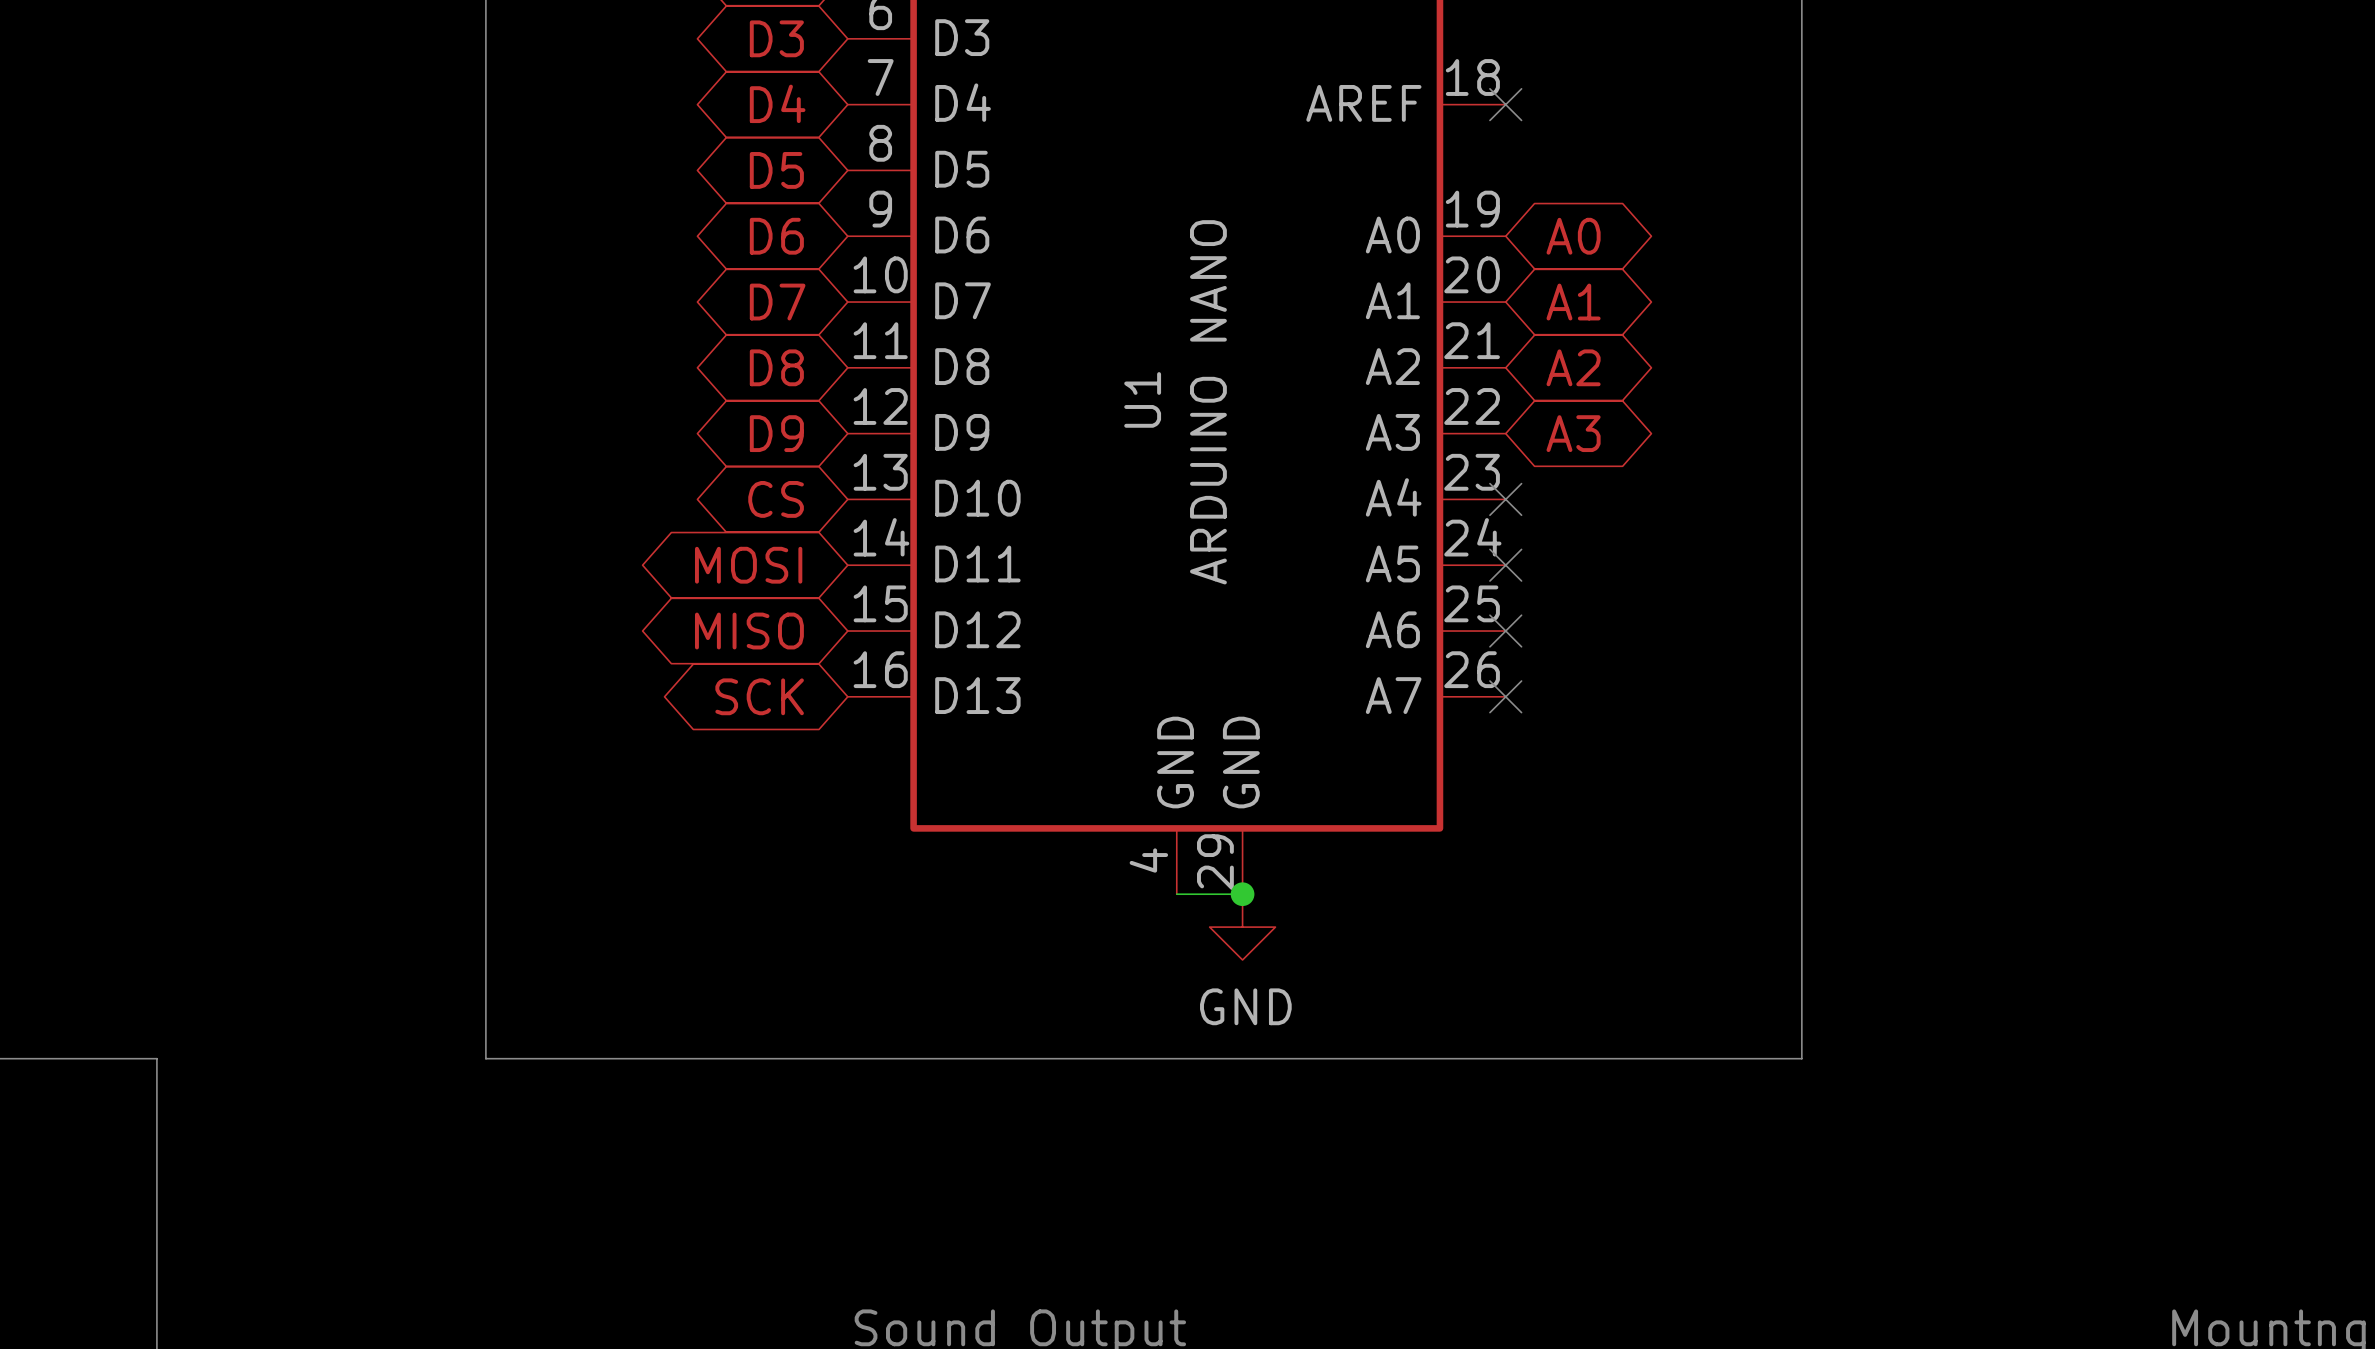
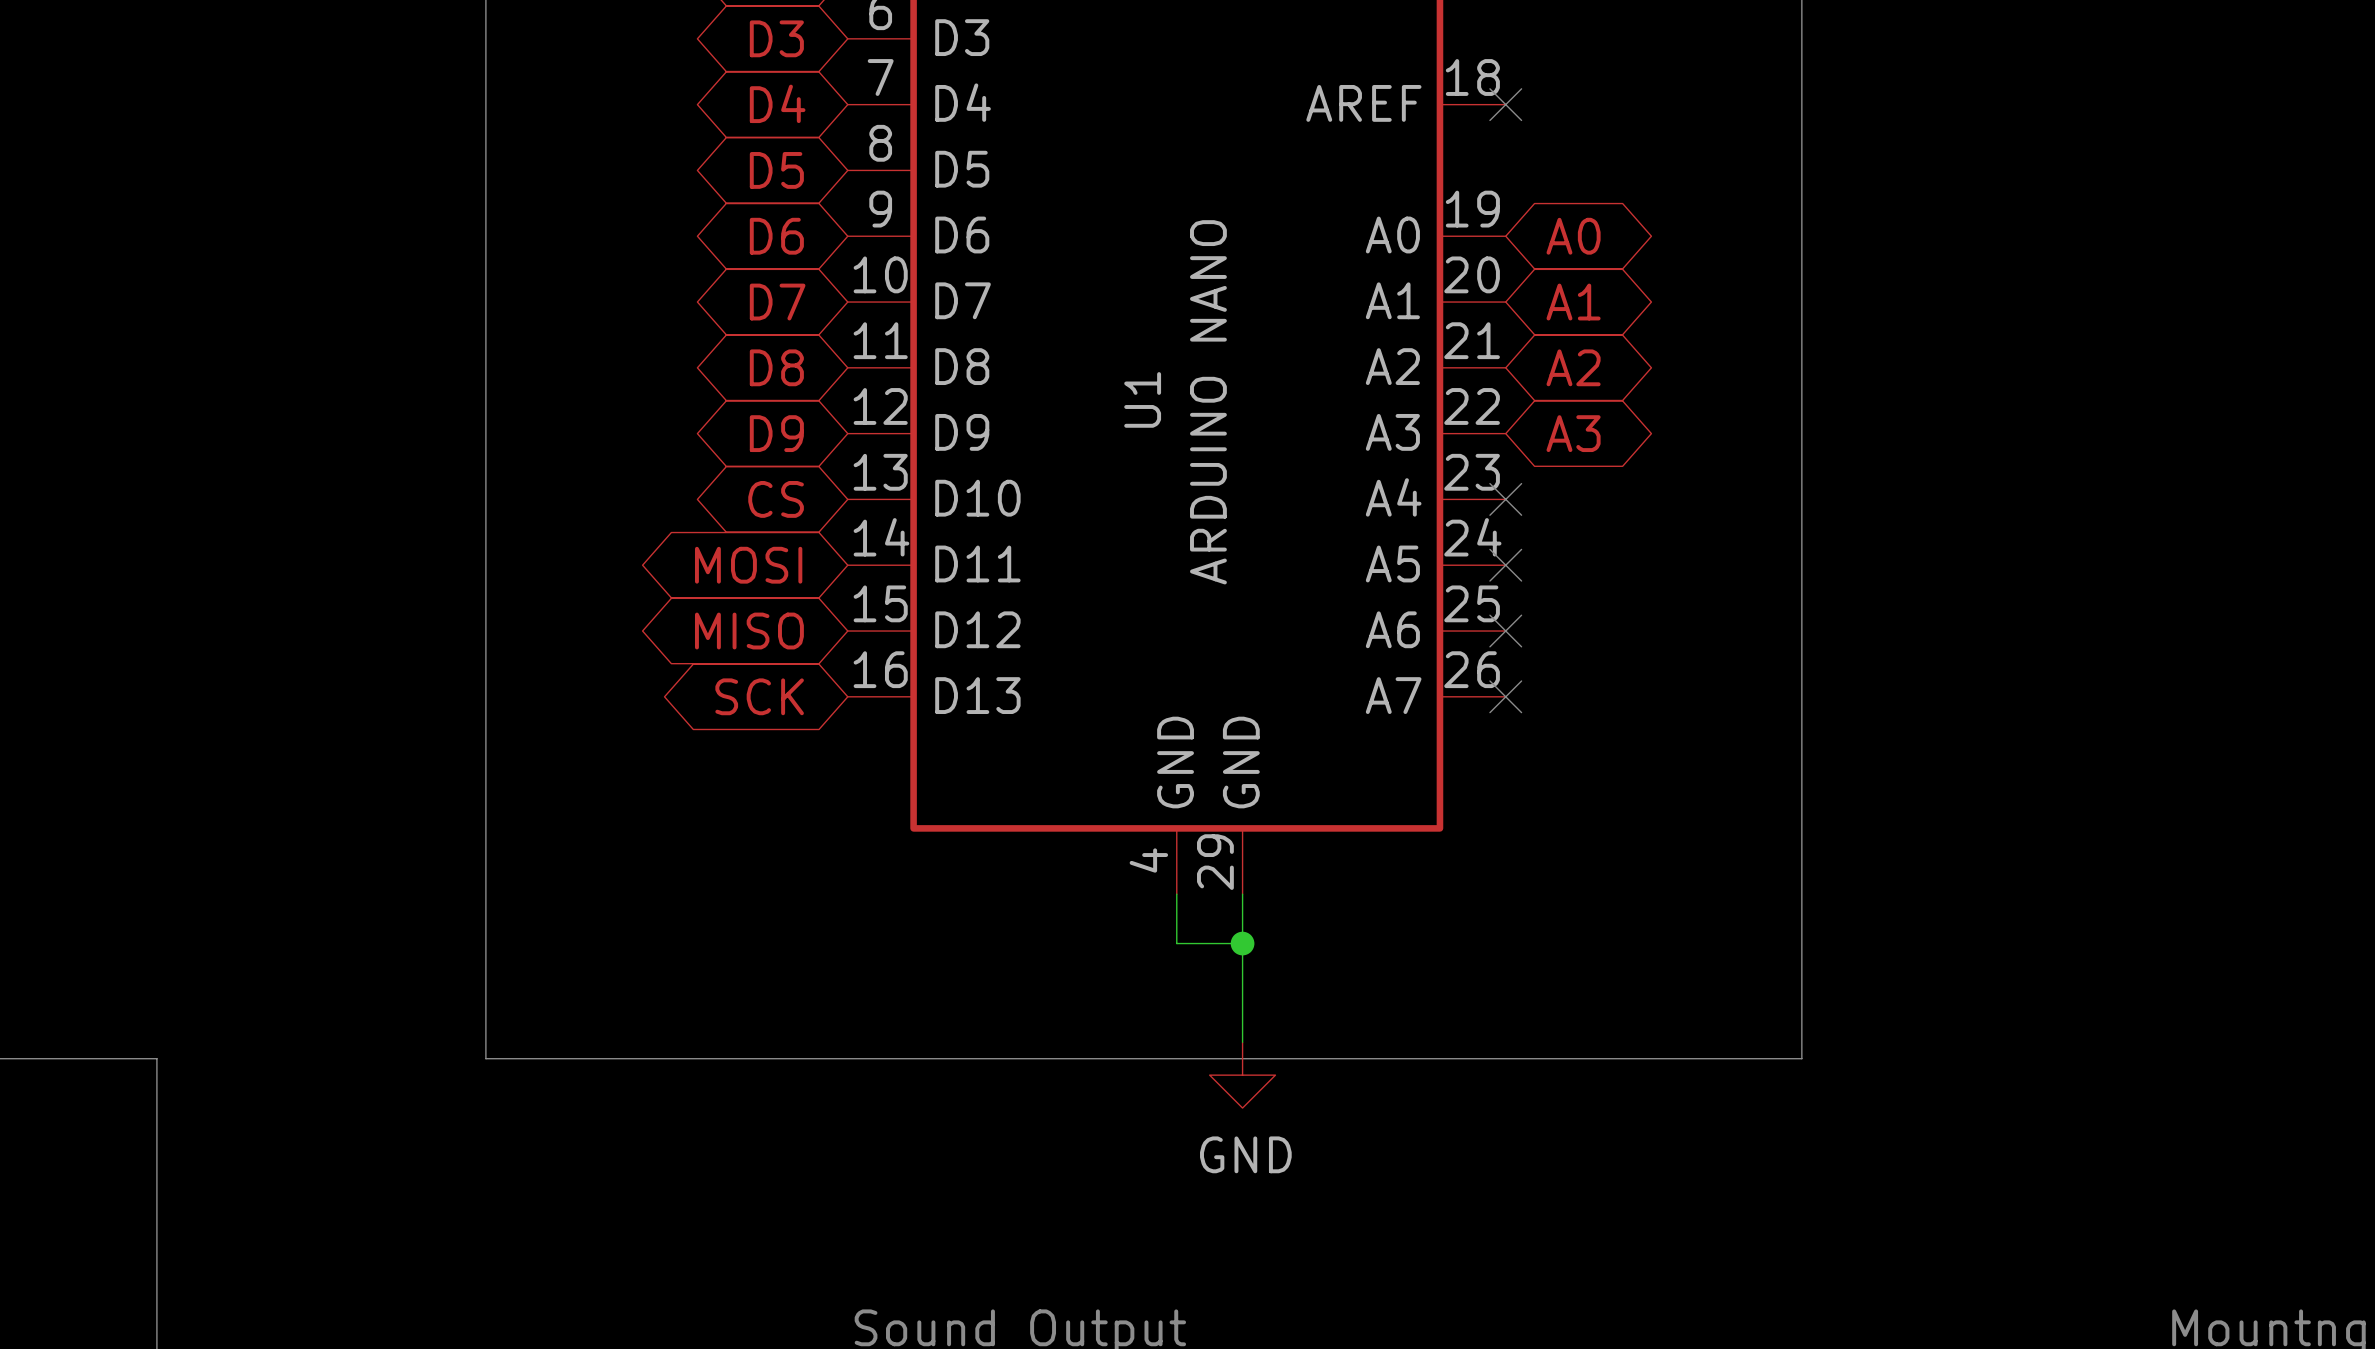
wire: (1176, 894) (1242, 894) -> (1176, 894) (1176, 943) (1242, 943)
wire: none -> (1242, 894) (1242, 1042)
junction position: (1242, 894) -> (1242, 943)
power symbol position: GND (1242, 927) -> GND (1242, 1075)

